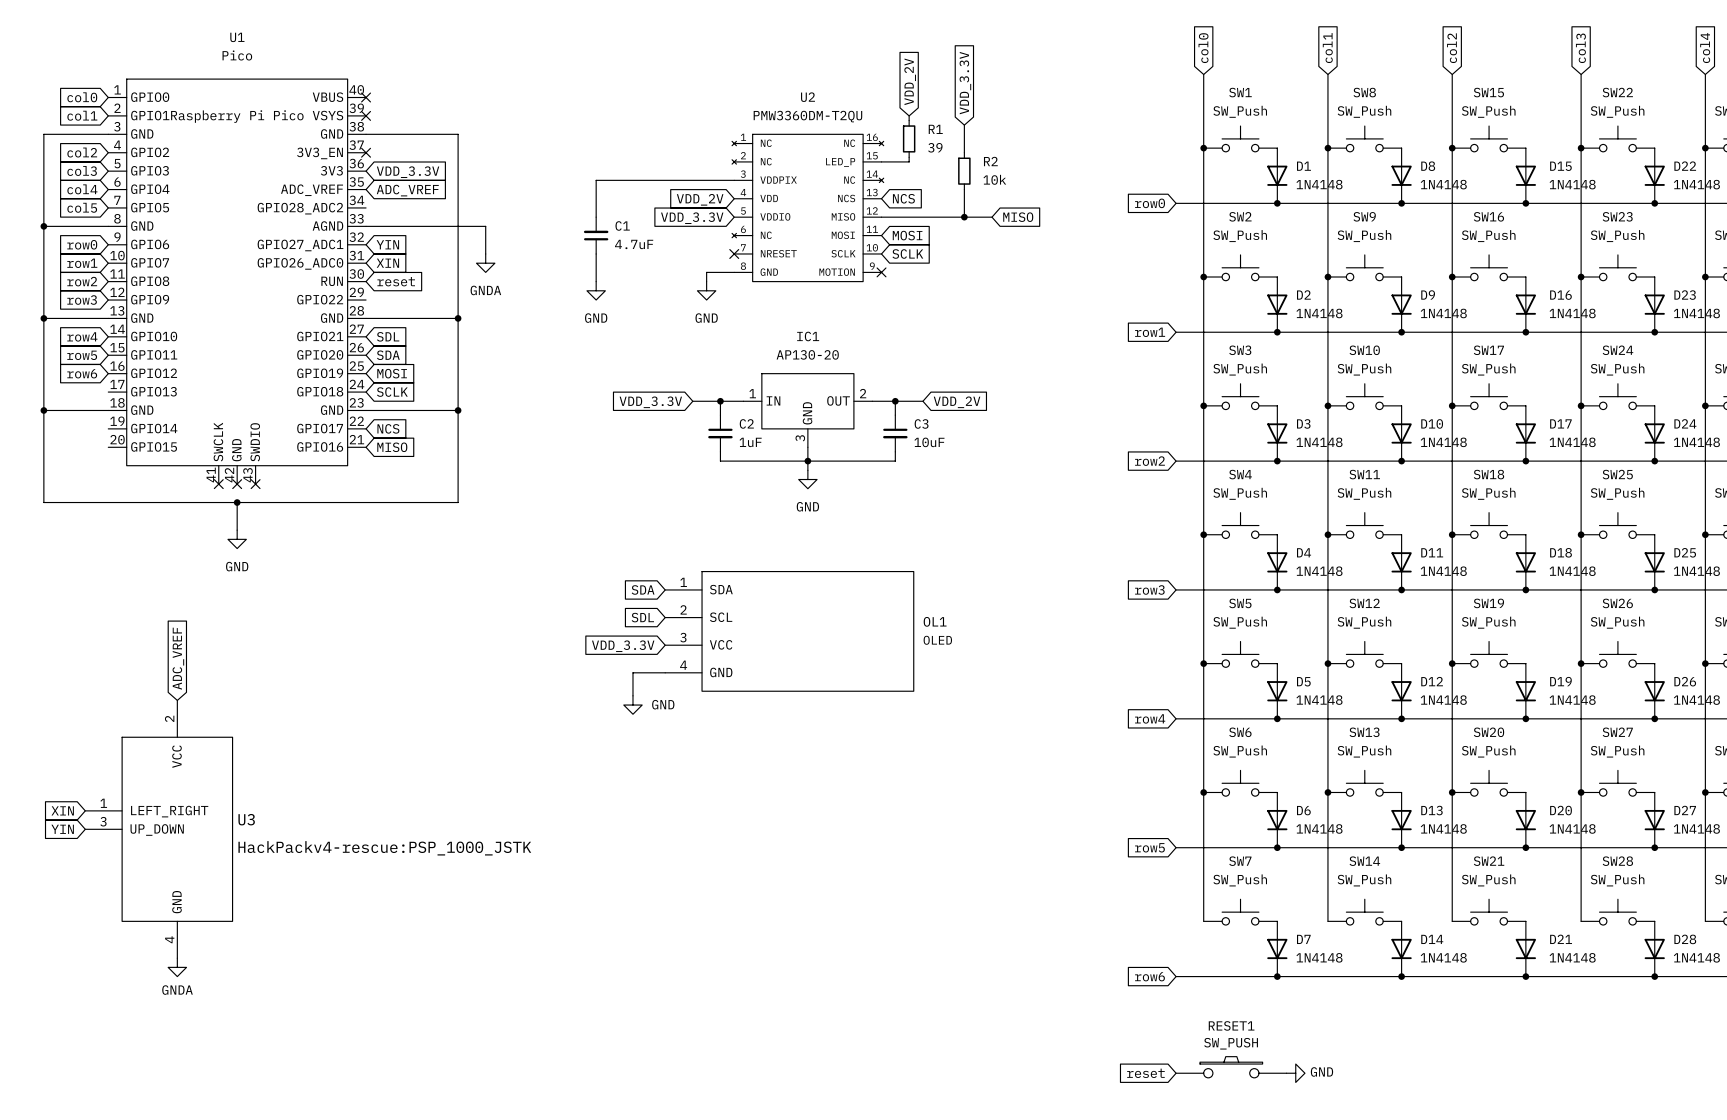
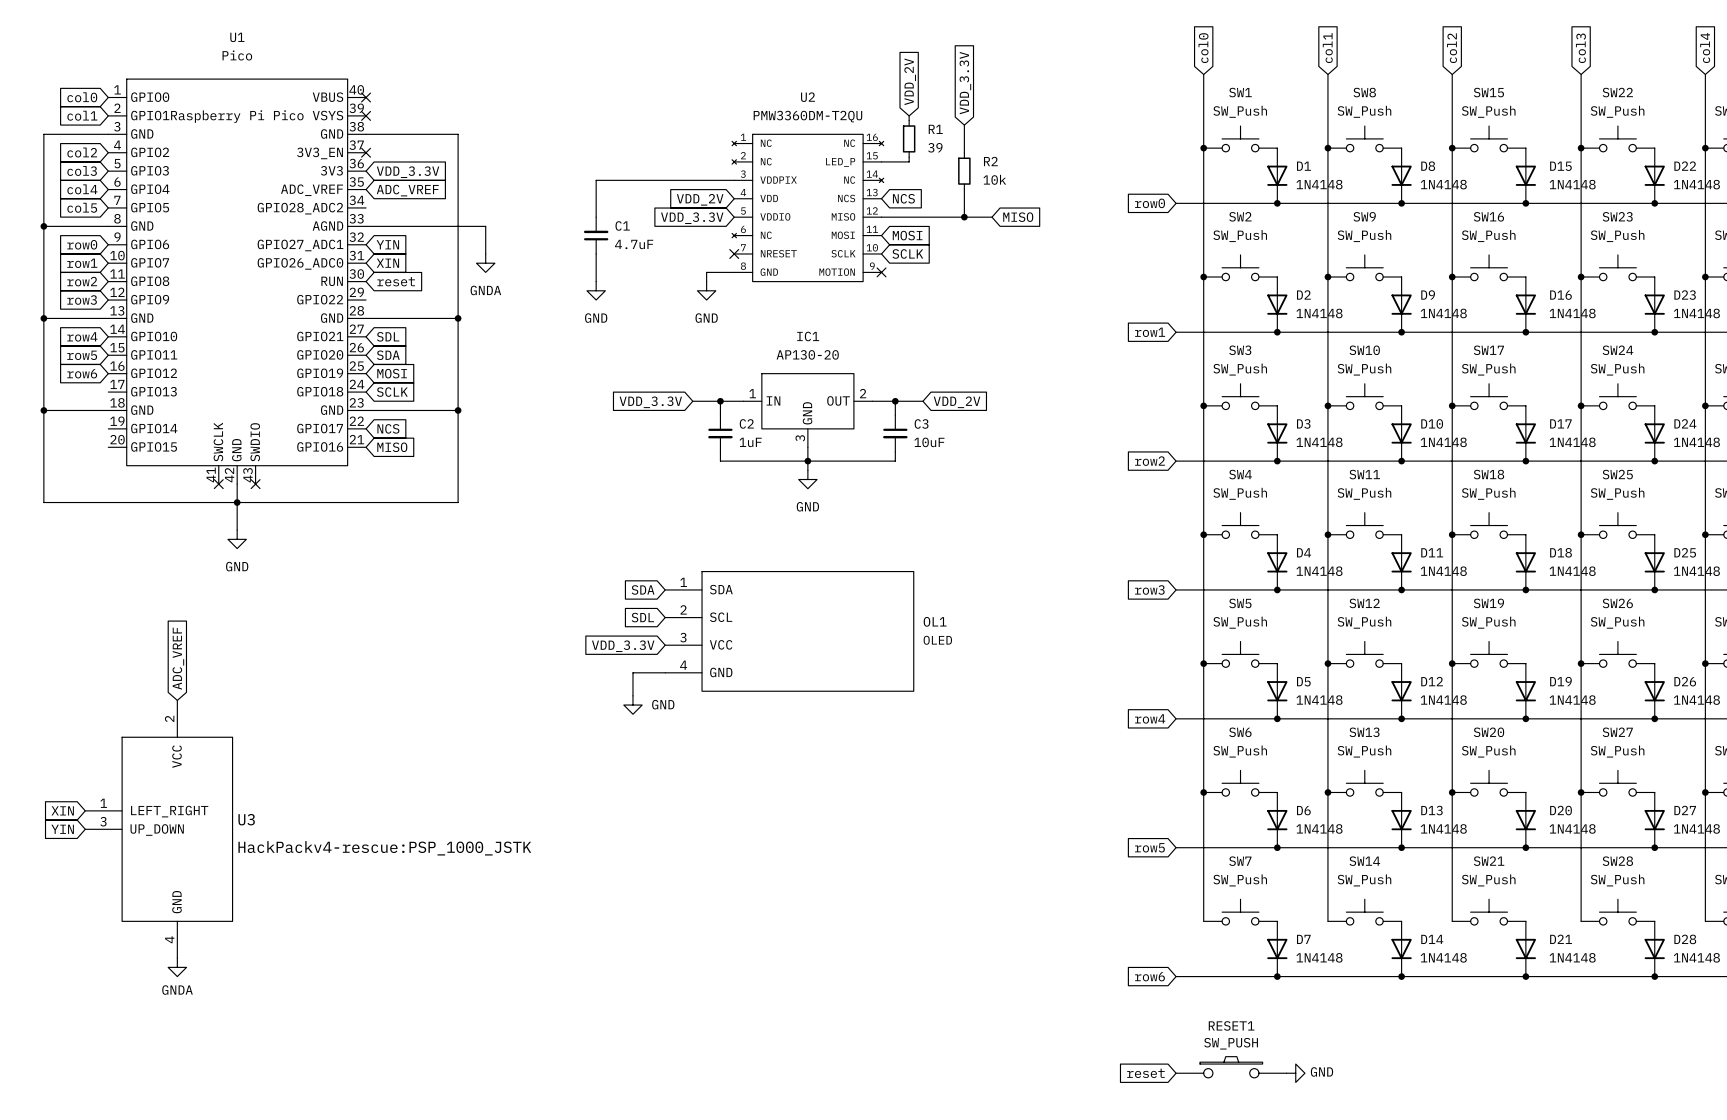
wire: none -> (237, 484) (237, 502)
no-connect mark: (237, 484) -> none

